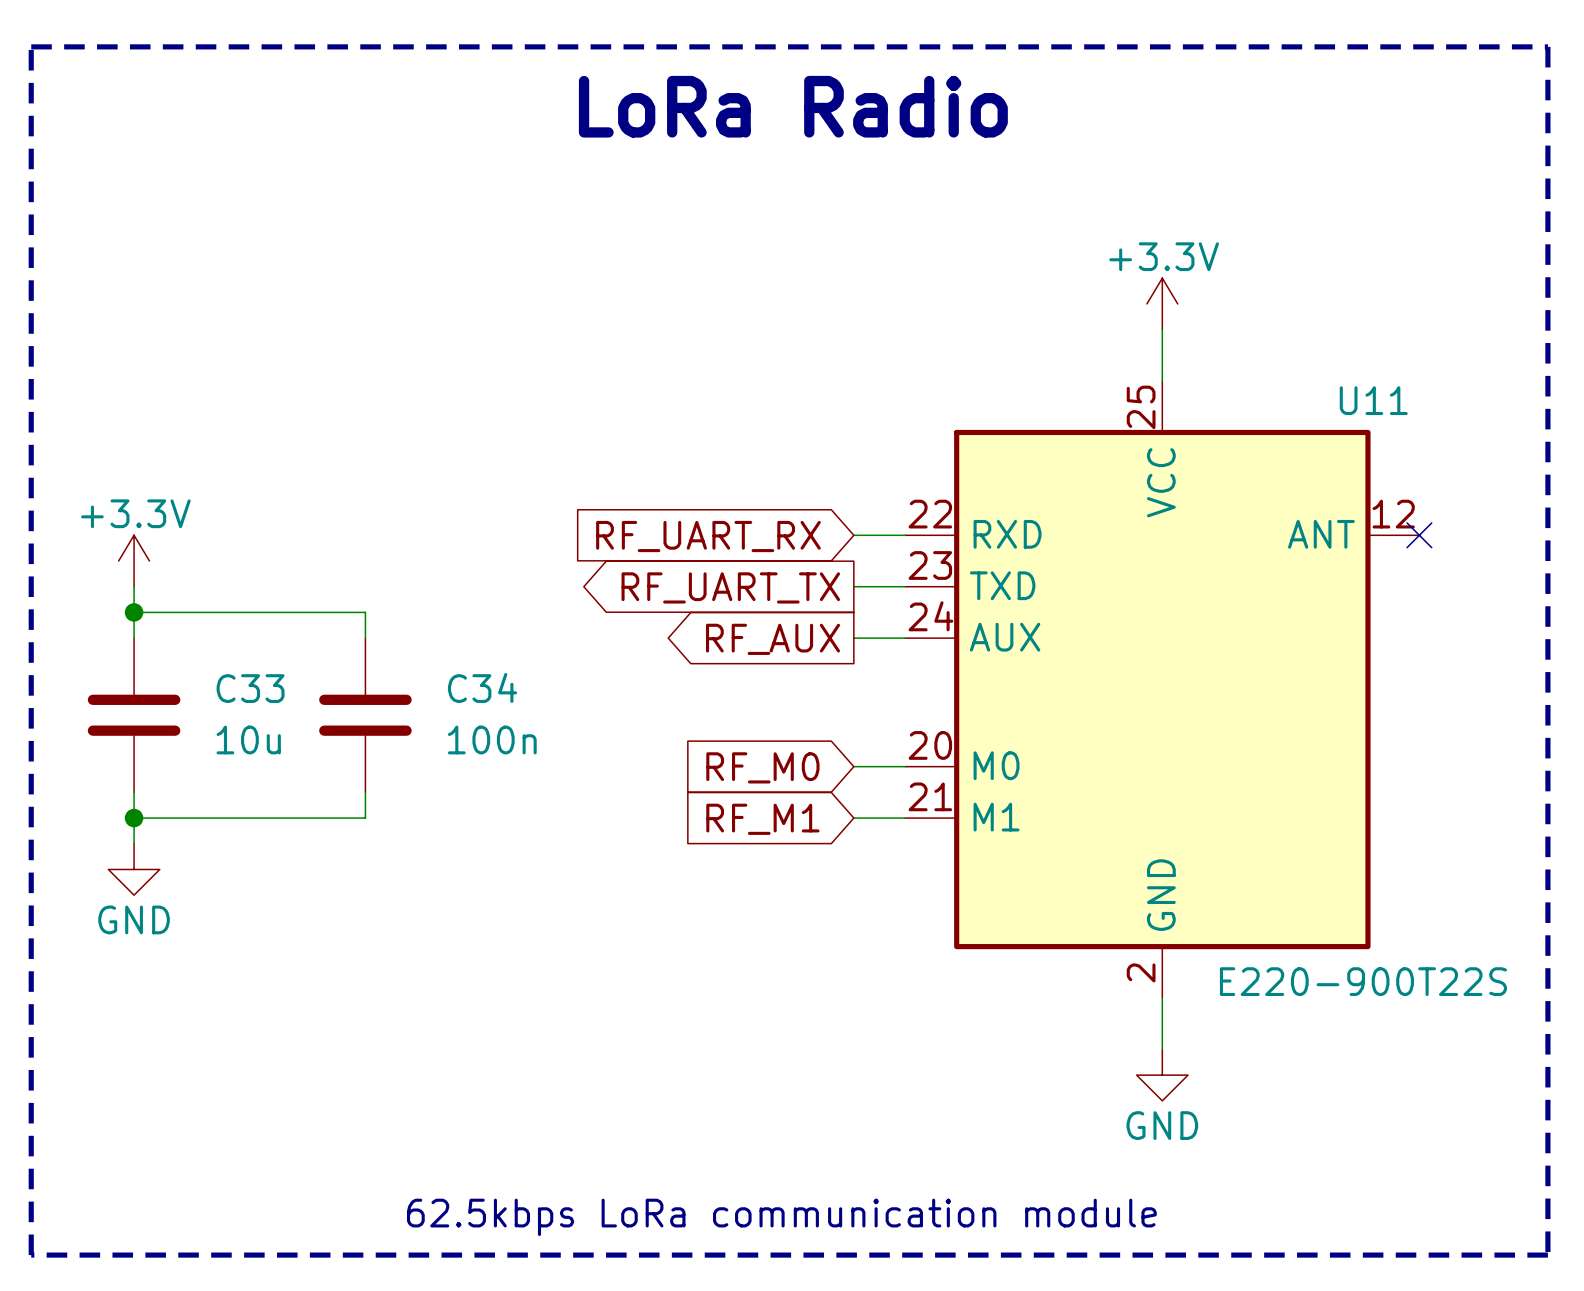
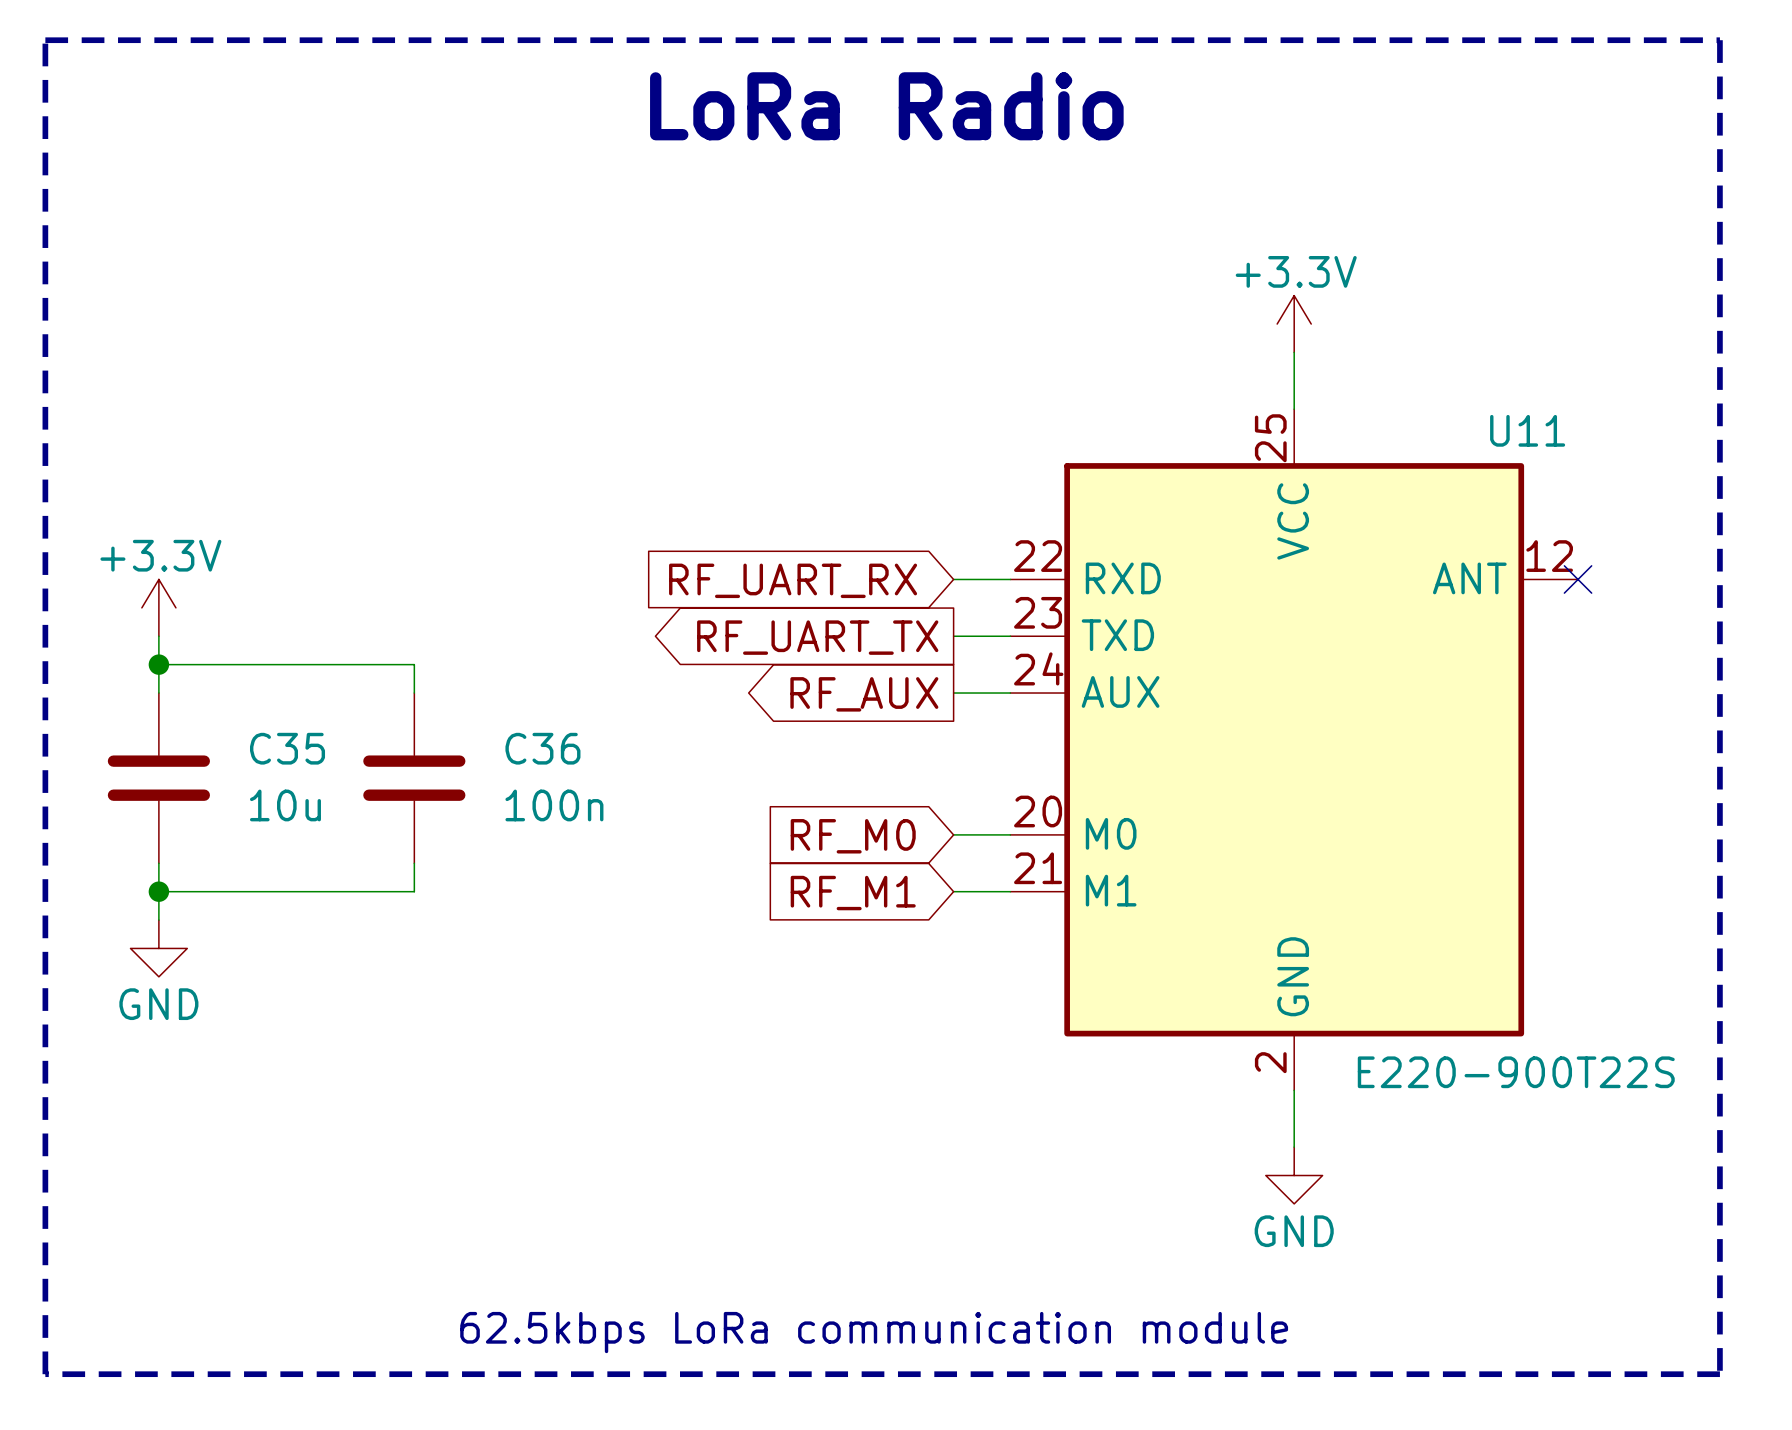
C34 name: C34 (482, 687) -> C36 (542, 748)
C33 name: C33 (250, 688) -> C35 (287, 748)

